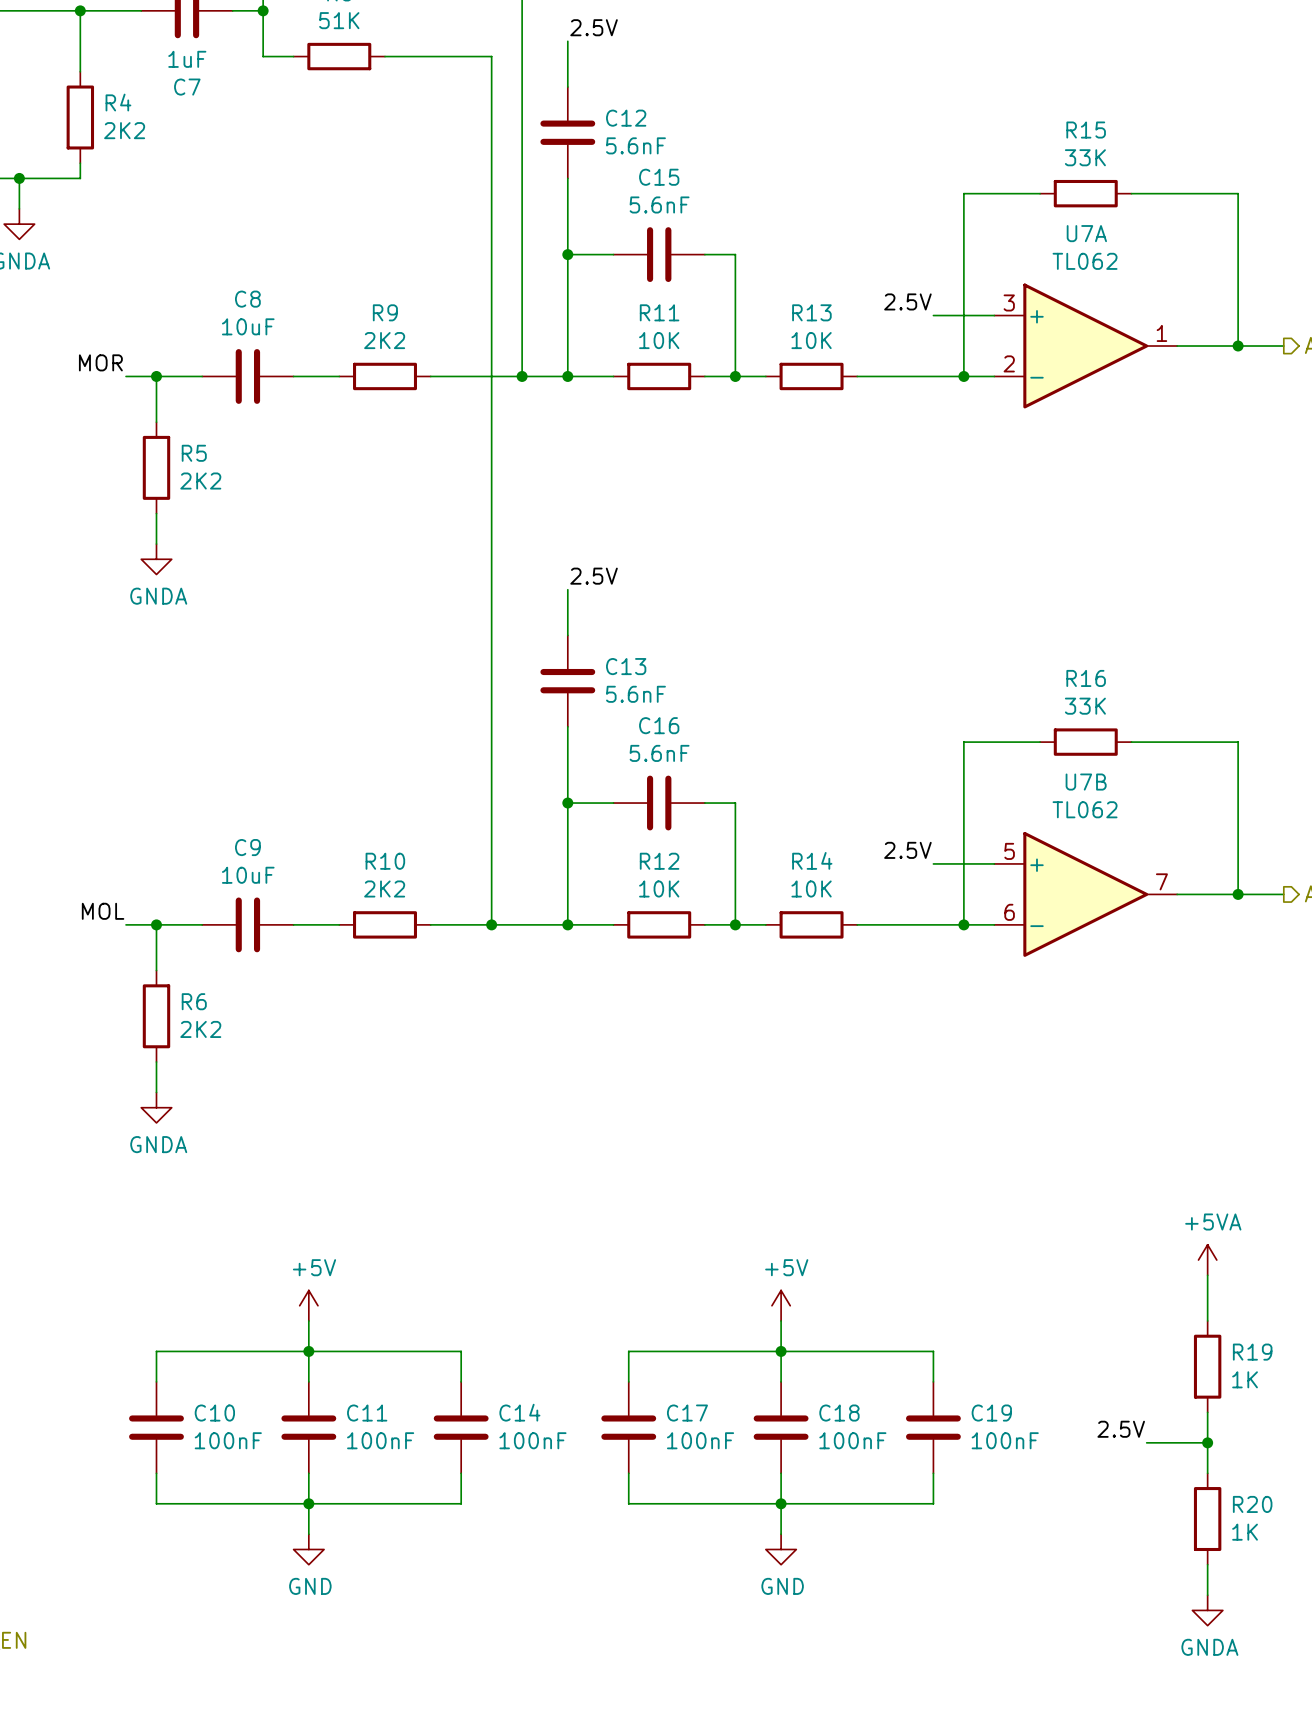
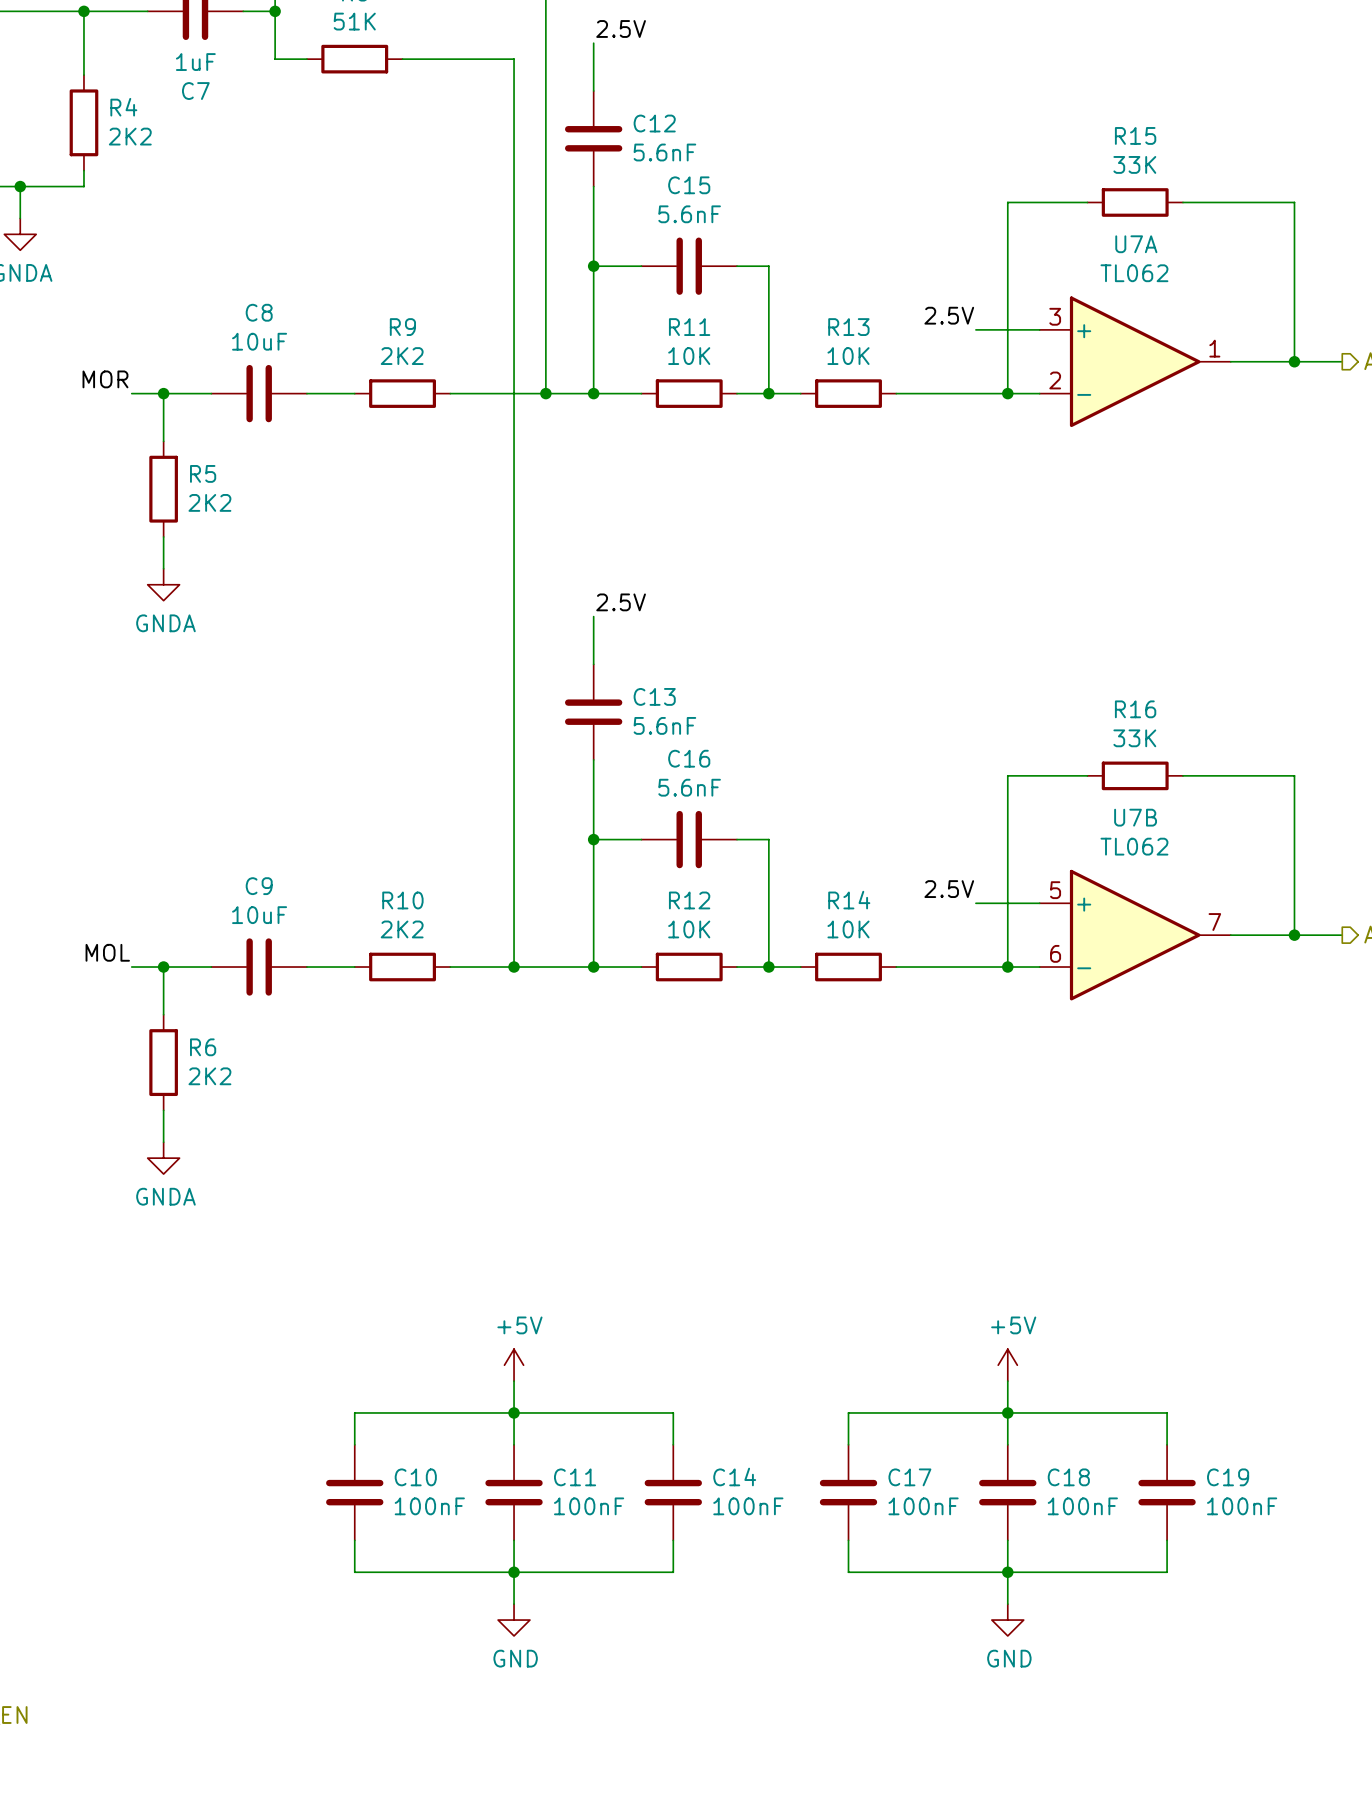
power symbol: +5VA (1207, 1260) -> none
wire: (1207, 1275) (1207, 1320) -> none
power symbol: +5V (308, 1305) -> none
power symbol: none -> +5V (514, 1365)
power symbol: +5V (781, 1305) -> none
power symbol: none -> +5V (1007, 1365)
wire: (308, 1320) (308, 1381) -> (514, 1381) (514, 1444)
wire: (781, 1320) (781, 1381) -> (1007, 1381) (1007, 1444)
junction: (308, 1351) -> none
wire: (339, 1351) (156, 1351) (156, 1381) -> (354, 1412) (354, 1444)
wire: (461, 1351) (461, 1381) -> (482, 1412) (657, 1412)
junction: none -> (514, 1412)
wire: (628, 1351) (628, 1381) -> (848, 1412) (848, 1444)
wire: (643, 1351) (811, 1351) -> (673, 1412) (673, 1444)
junction: (781, 1351) -> none
wire: (933, 1351) (933, 1381) -> (975, 1412) (1167, 1412) (1167, 1444)
junction: none -> (1007, 1412)
R19: 1K (1207, 1366) -> none
wire: (1207, 1412) (1207, 1473) -> none
C10 position: (156, 1427) -> (354, 1492)
C11 position: (308, 1427) -> (514, 1492)
C14 position: (461, 1427) -> (673, 1492)
C17 position: (628, 1427) -> (848, 1492)
C18 position: (781, 1427) -> (1007, 1492)
C19 position: (933, 1427) -> (1167, 1492)
label: 2.5V (1121, 1429) -> none
wire: (1146, 1442) (1207, 1442) -> none
junction: (1207, 1442) -> none
wire: (156, 1473) (156, 1503) (339, 1503) -> (354, 1540) (354, 1572)
wire: (308, 1473) (308, 1534) -> (514, 1540) (514, 1604)
wire: (461, 1473) (461, 1503) -> (657, 1572) (482, 1572)
wire: (628, 1473) (628, 1503) -> (848, 1540) (848, 1572)
wire: (781, 1473) (781, 1534) -> (1007, 1540) (1007, 1604)
wire: (933, 1473) (933, 1503) -> (1167, 1540) (1167, 1572) (975, 1572)
junction: (308, 1503) -> none
junction: none -> (514, 1572)
wire: (643, 1503) (811, 1503) -> (673, 1572) (673, 1540)
junction: (781, 1503) -> none
junction: none -> (1007, 1572)
R20: 1K (1207, 1519) -> none
power symbol: GND (308, 1549) -> none
power symbol: none -> GND (514, 1620)
power symbol: GND (781, 1549) -> none
power symbol: none -> GND (1007, 1620)
wire: (1207, 1564) (1207, 1595) -> none
power symbol: GNDA (1207, 1610) -> none

